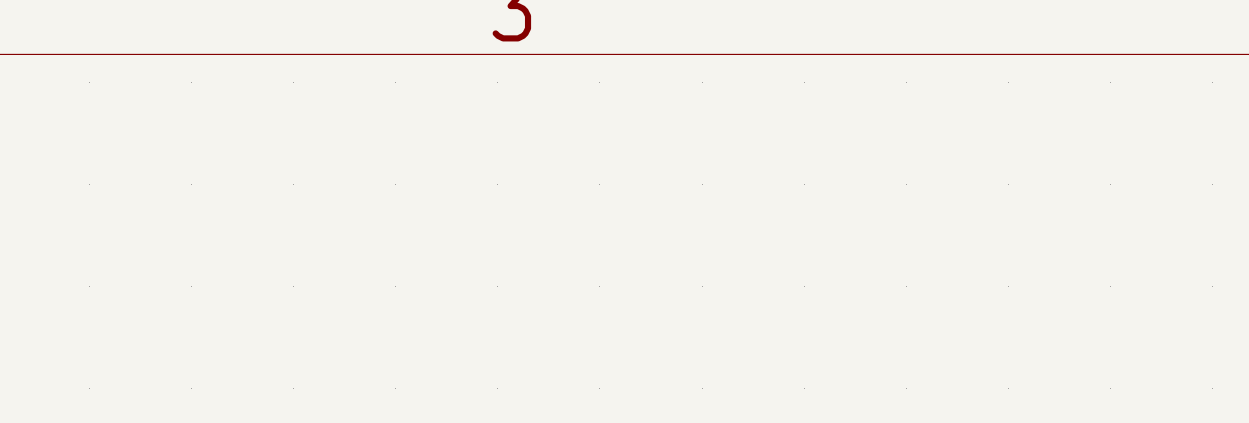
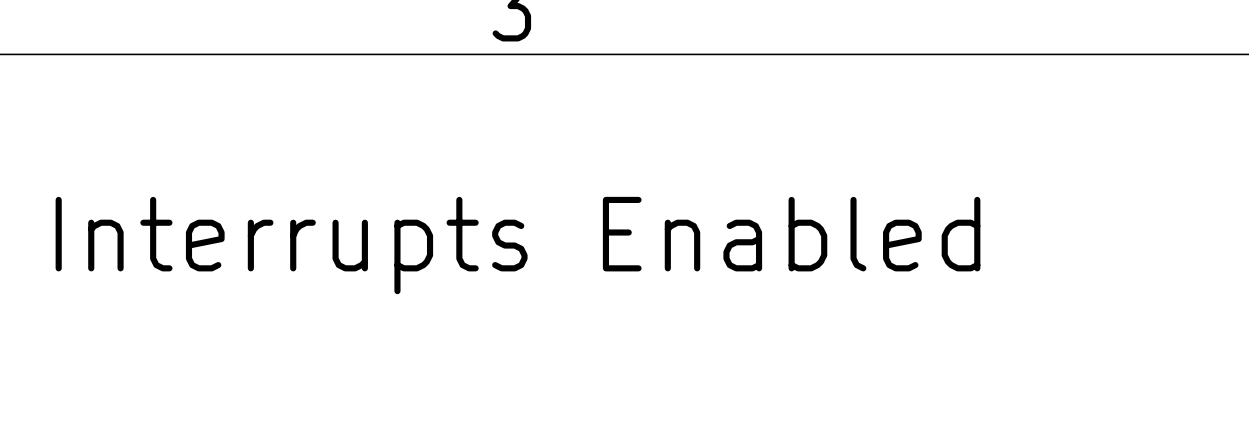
text: none -> Interrupts Enabled (517, 245)

